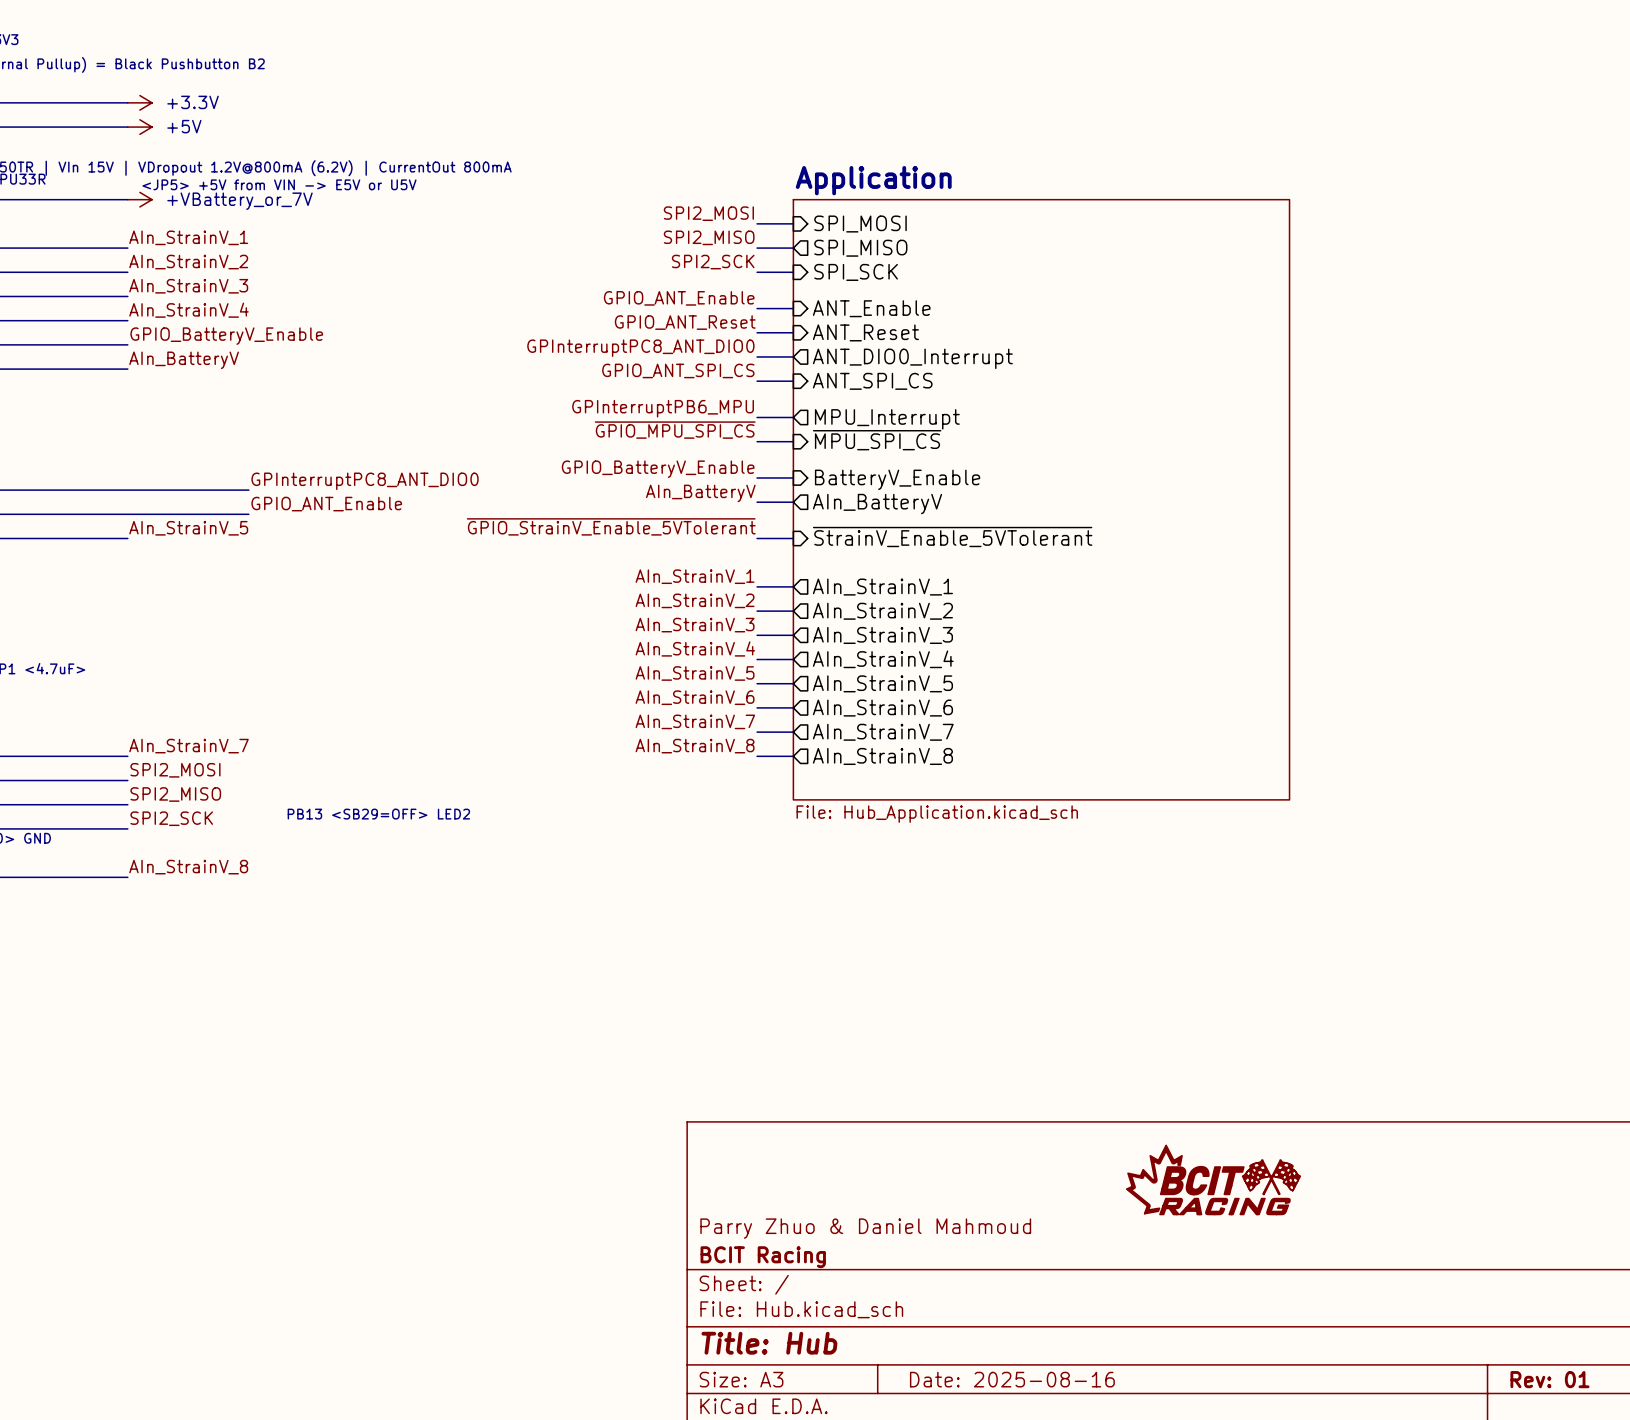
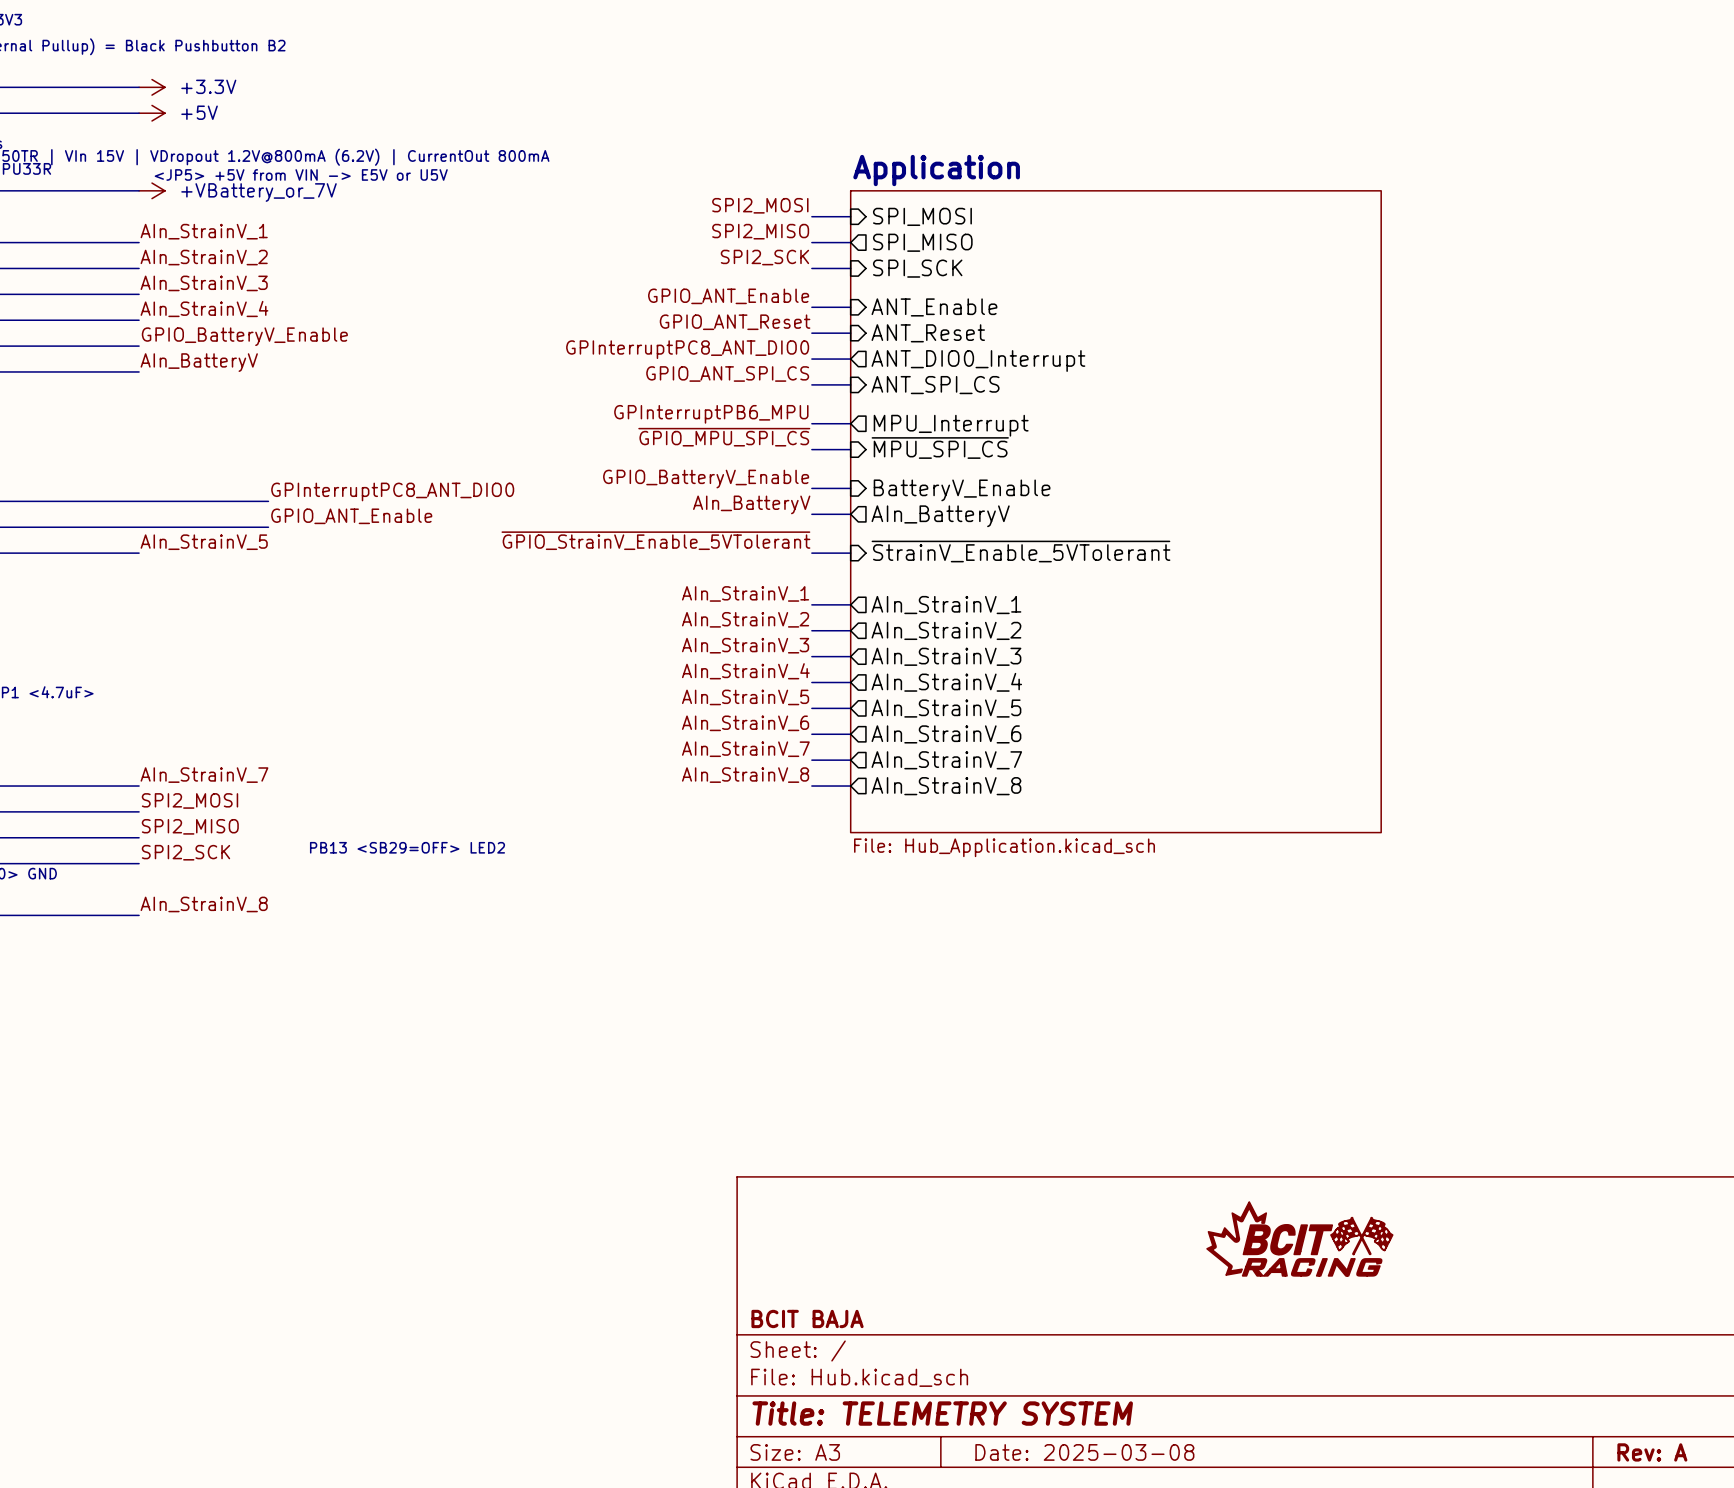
title block: Parry Zhuo & Daniel Mahmoud (865, 1228) -> none
title block: BCIT Racing (763, 1257) -> BCIT BAJA (807, 1318)
title block: Title: Hub (769, 1343) -> Title: TELEMETRY SYSTEM (942, 1413)
title block: Date: 2025-08-16 (1012, 1379) -> Date: 2025-03-08 (1084, 1452)
title block: Rev: 01 (1549, 1379) -> Rev: A (1652, 1452)

